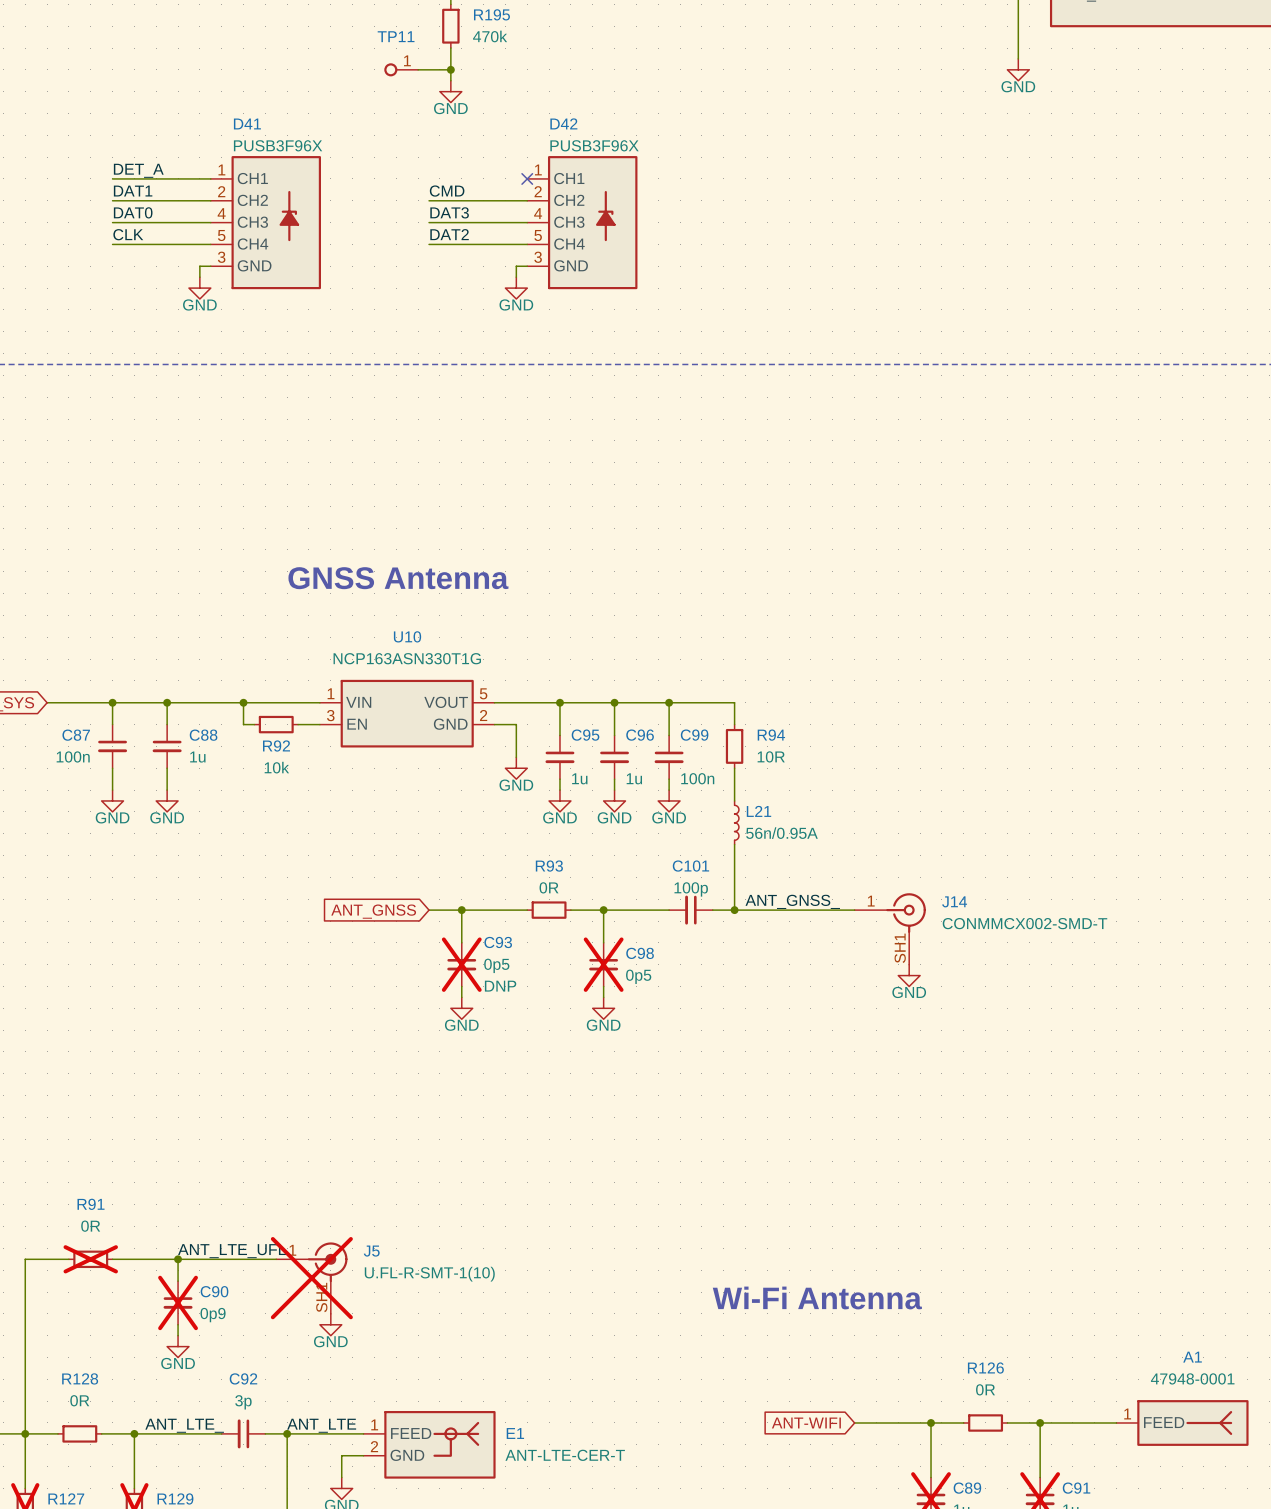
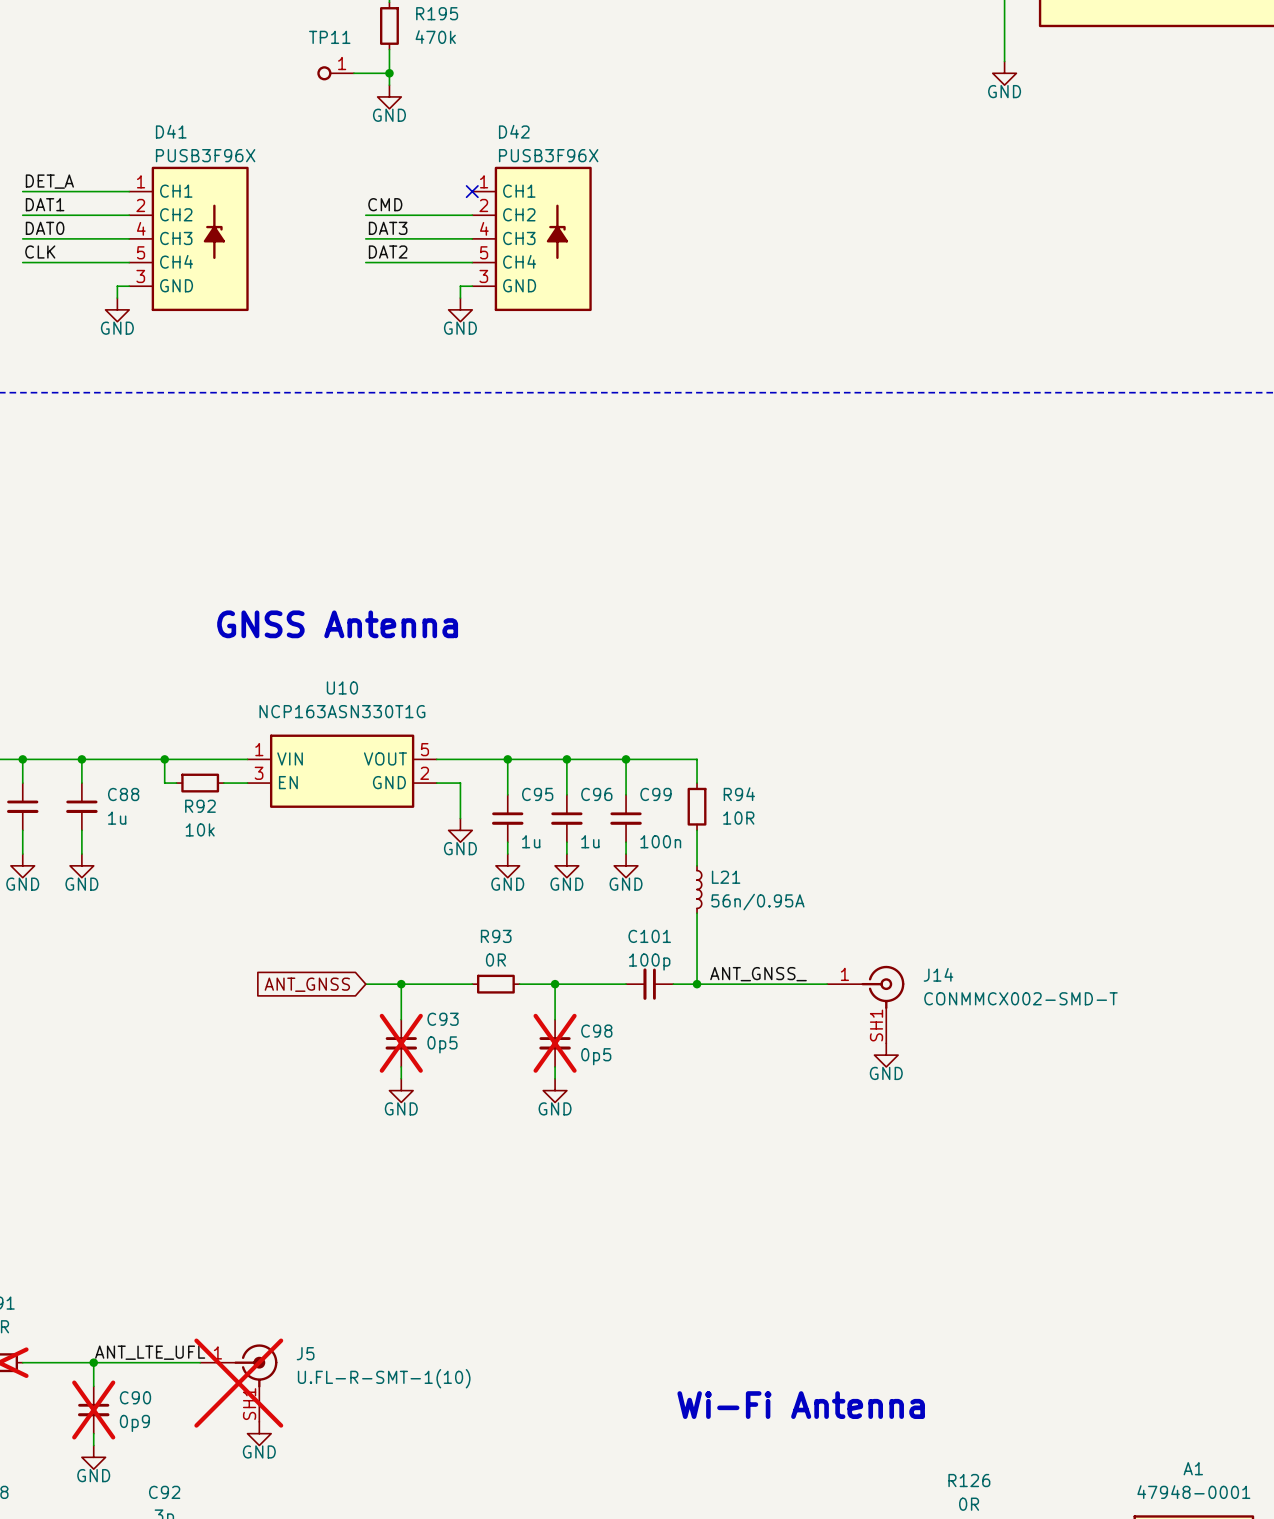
C93 text: DNP (500, 986) -> none

